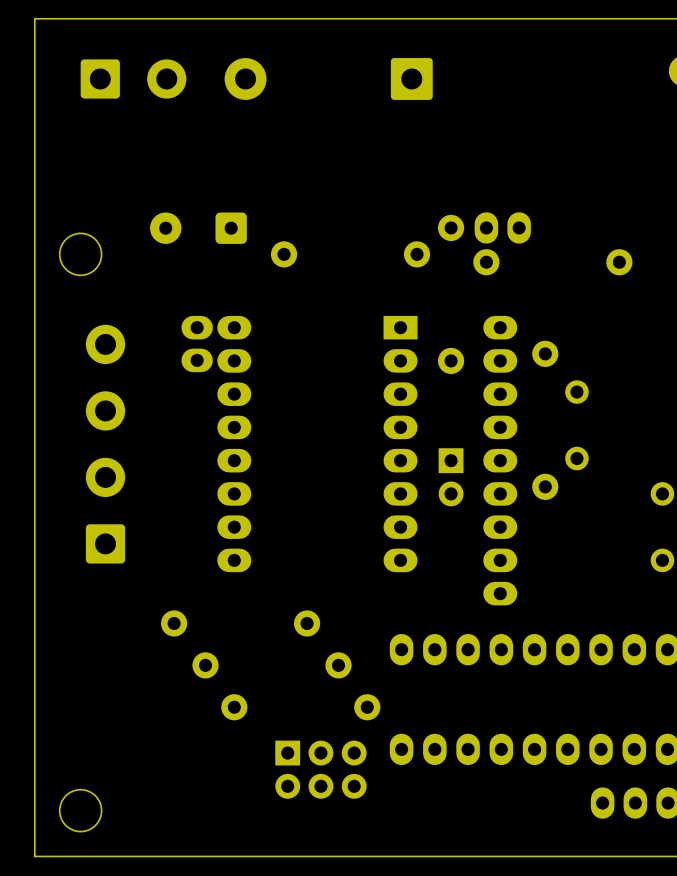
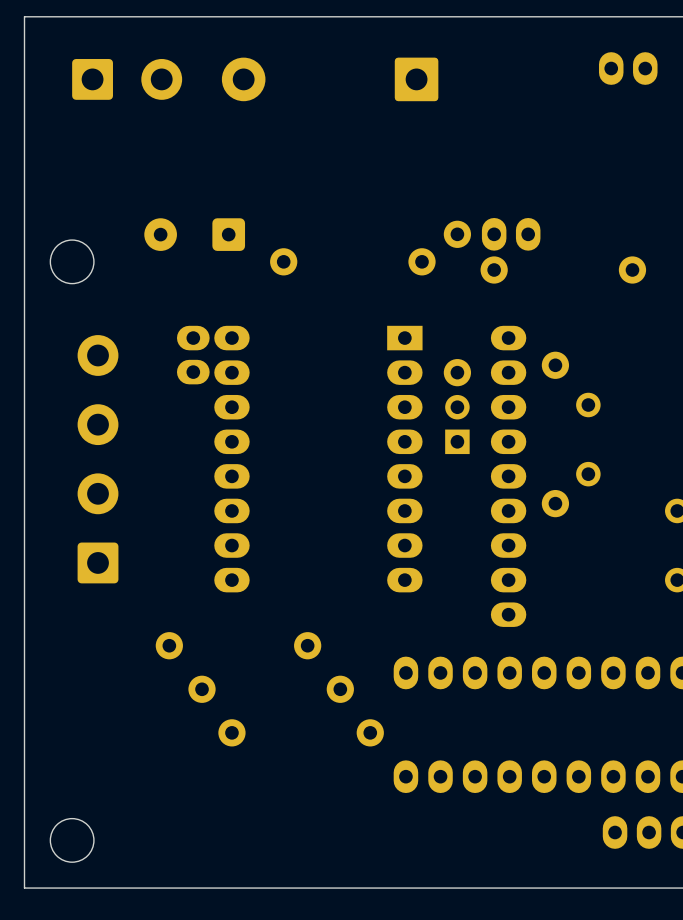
part: none -> (628, 68)
part: none -> (457, 424)
part: (451, 477) -> none
part: (320, 769) -> none

